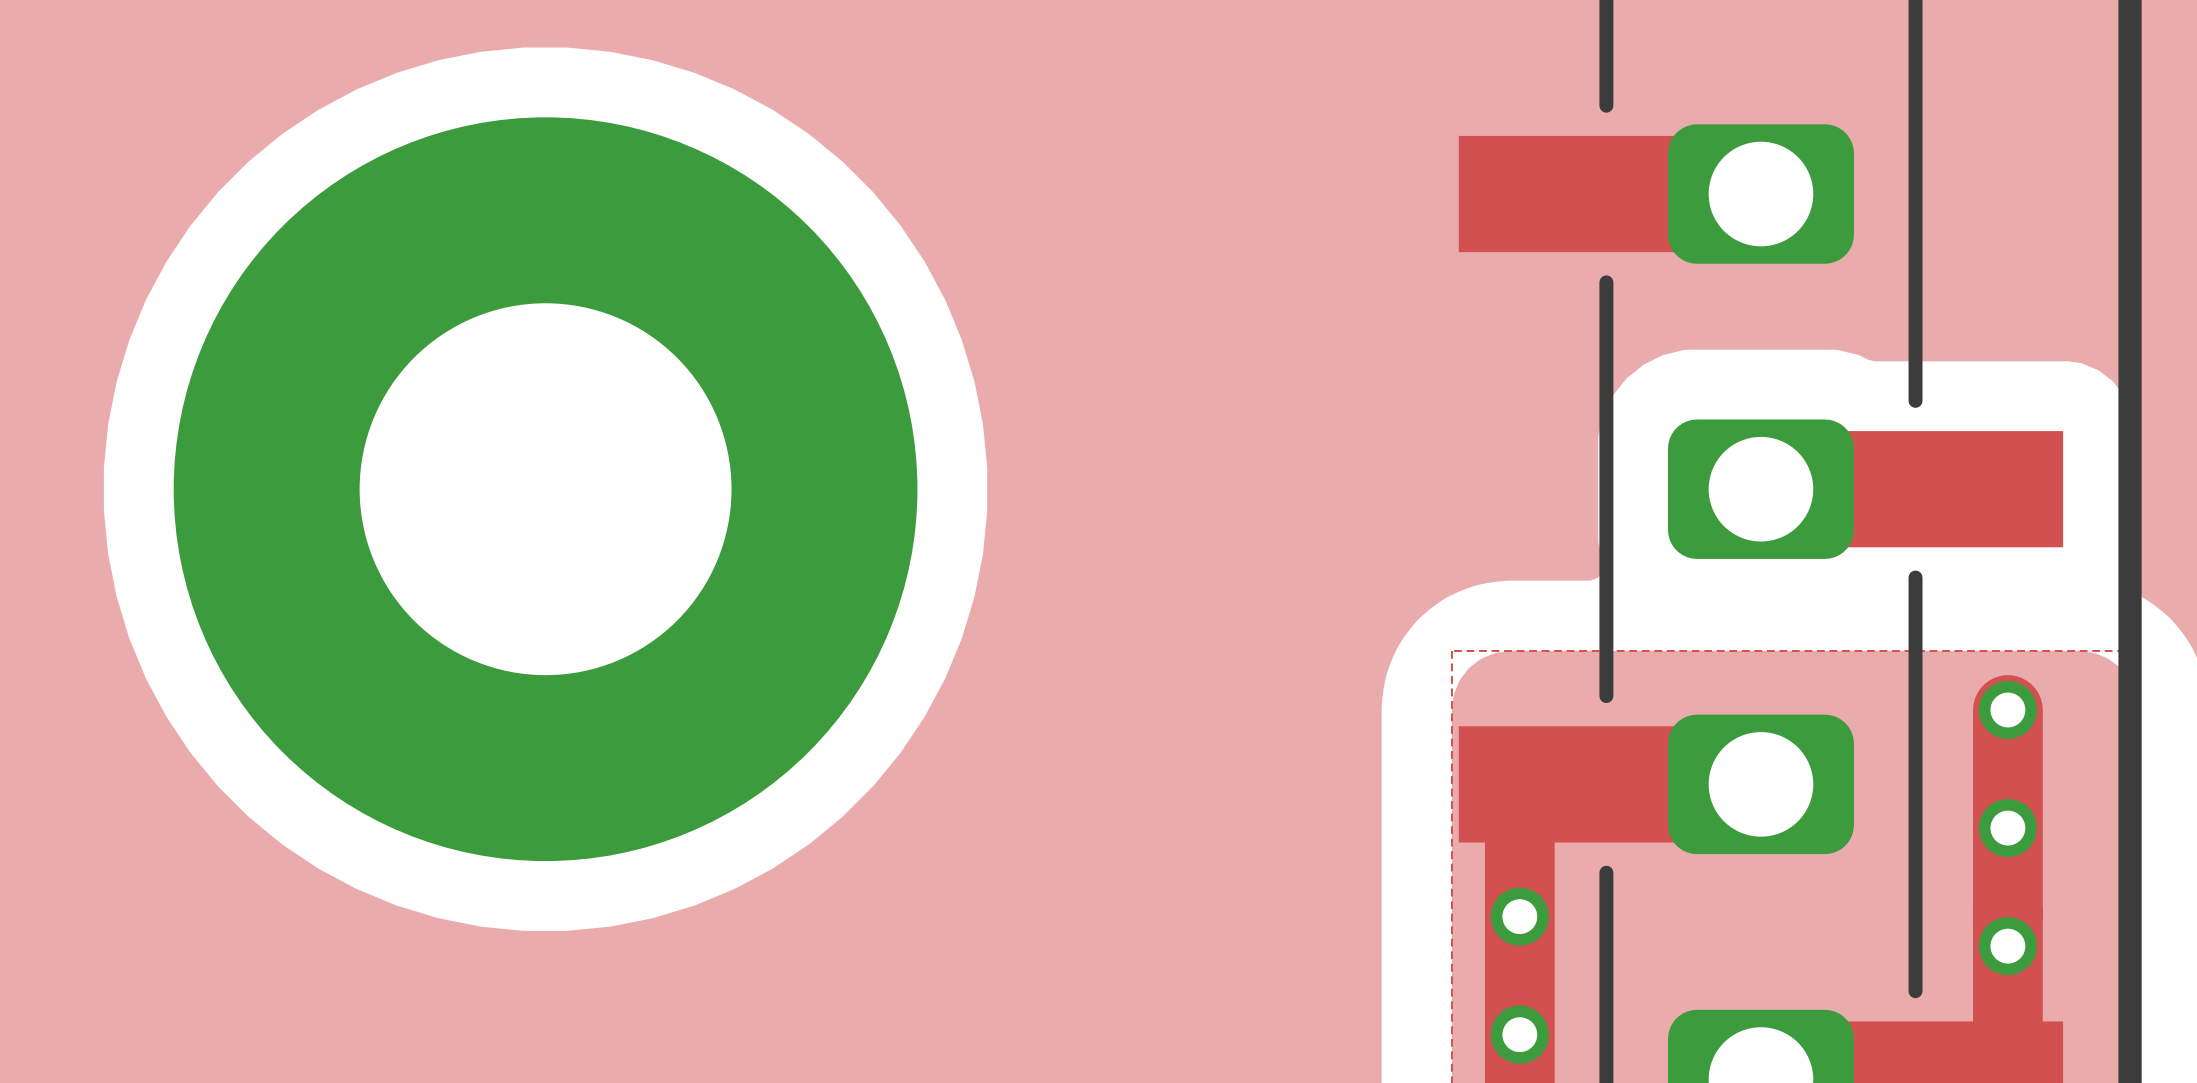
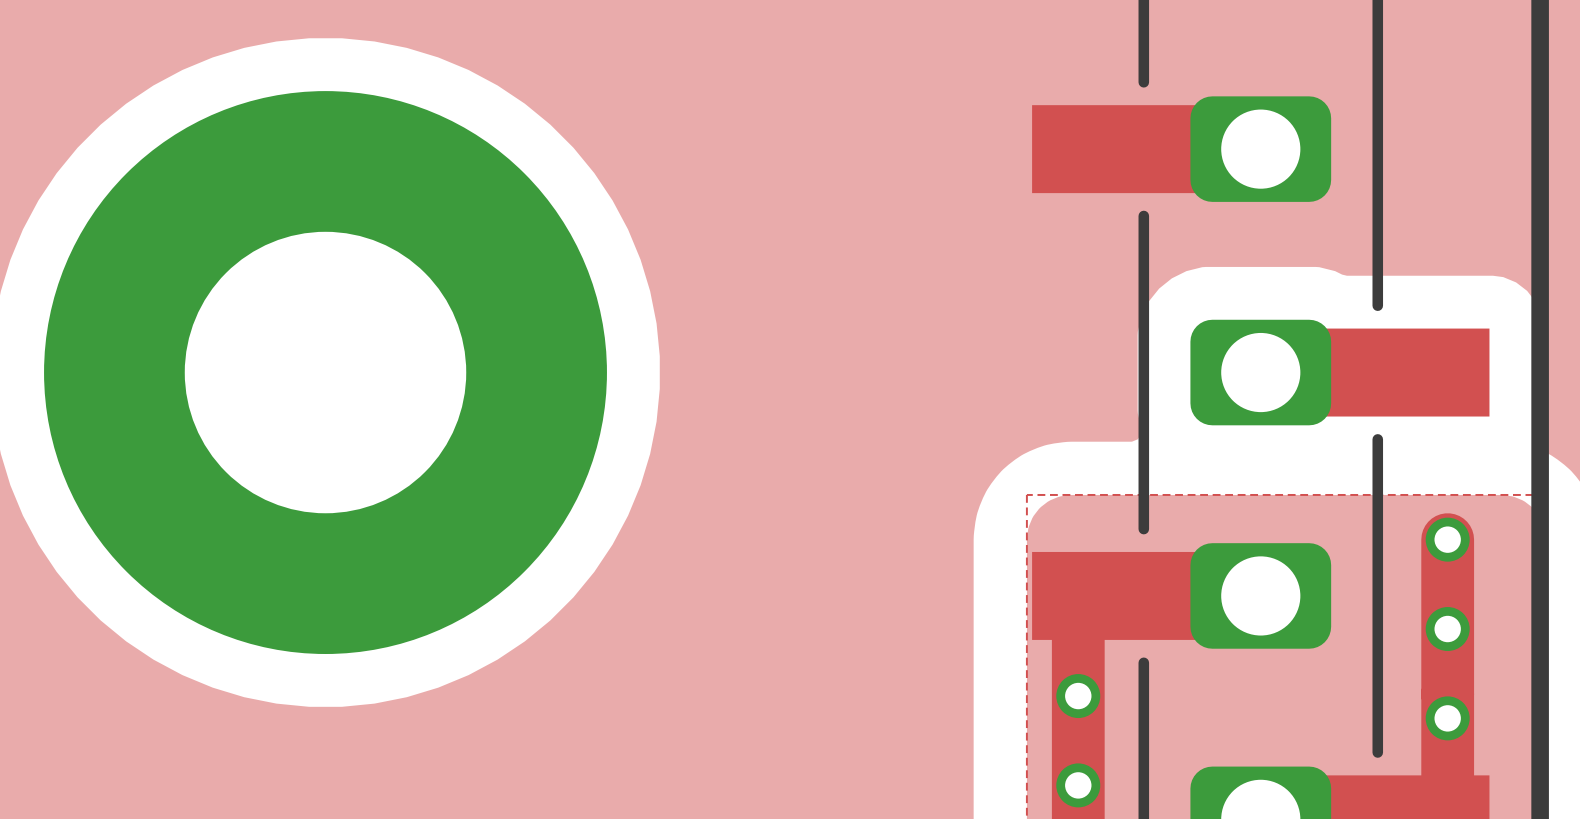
part position: (545, 489) -> (325, 372)

